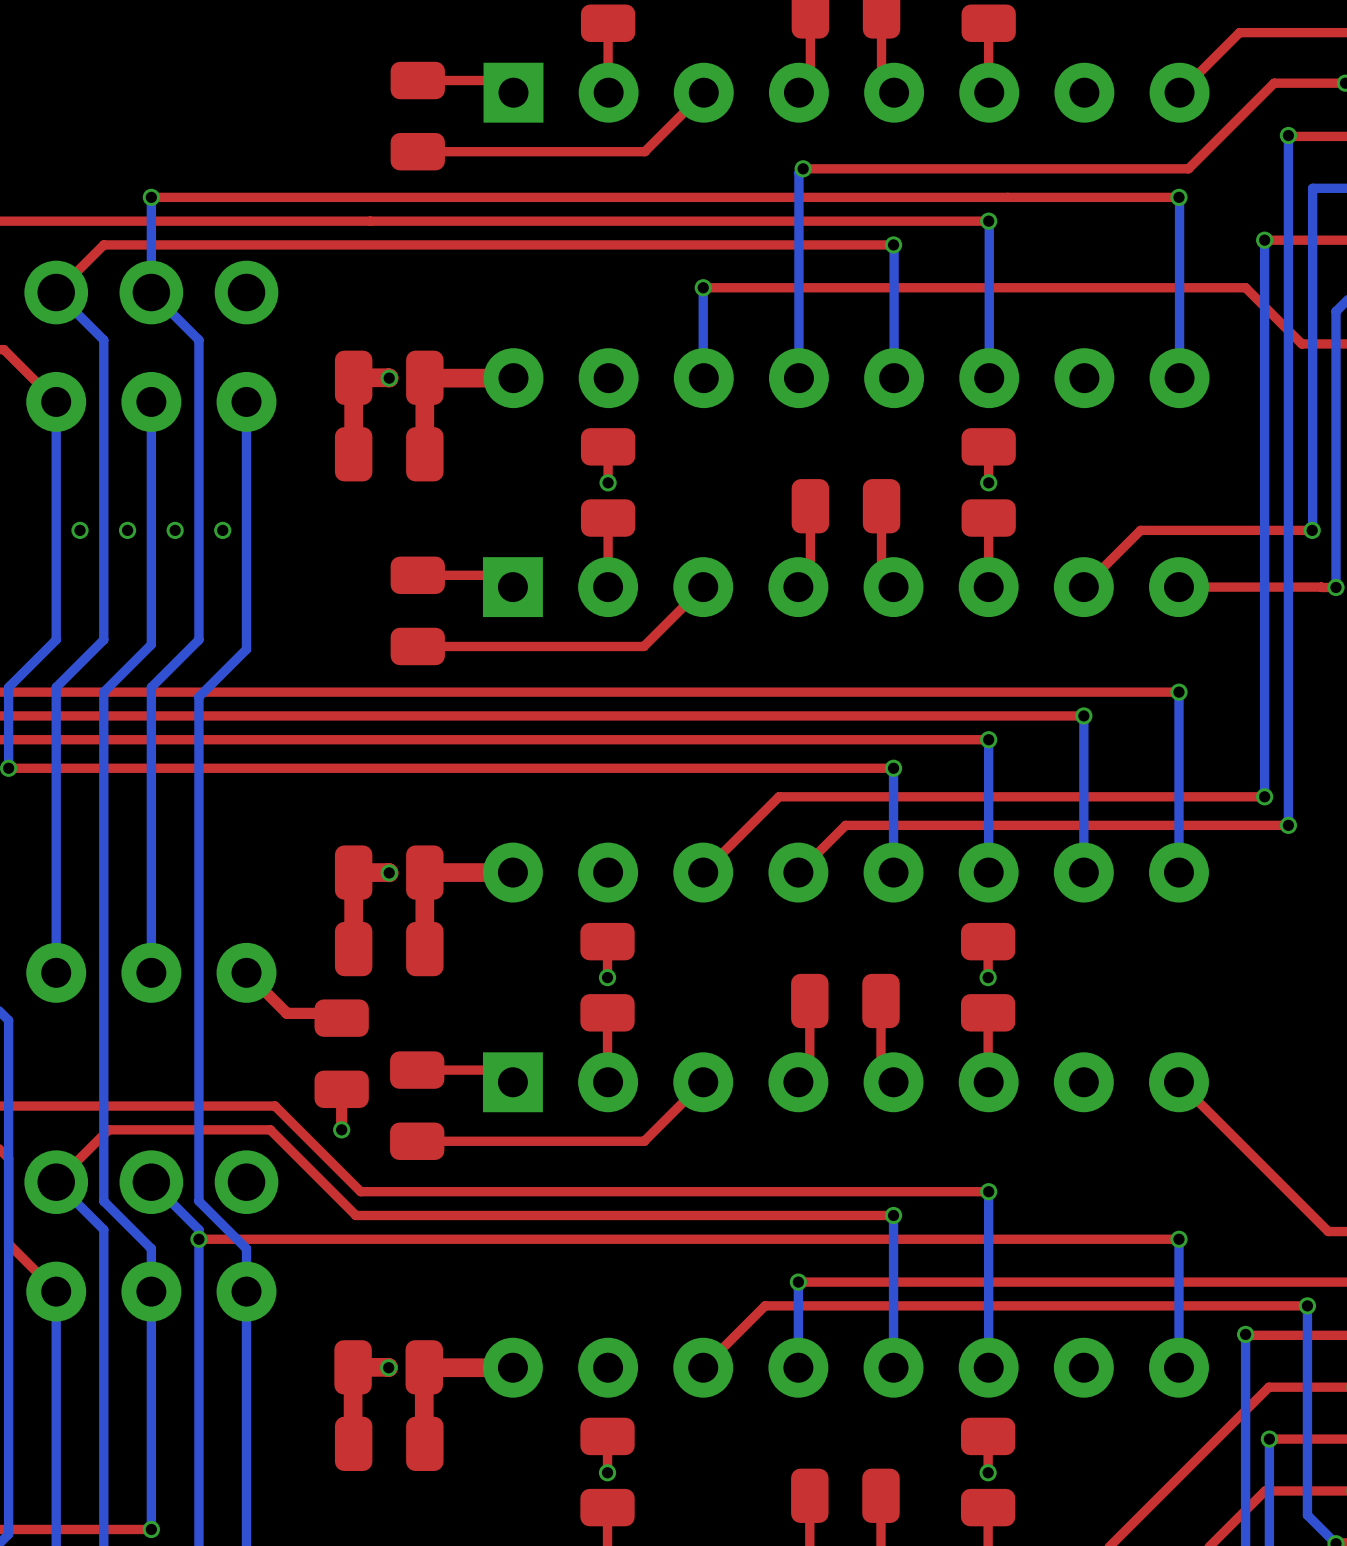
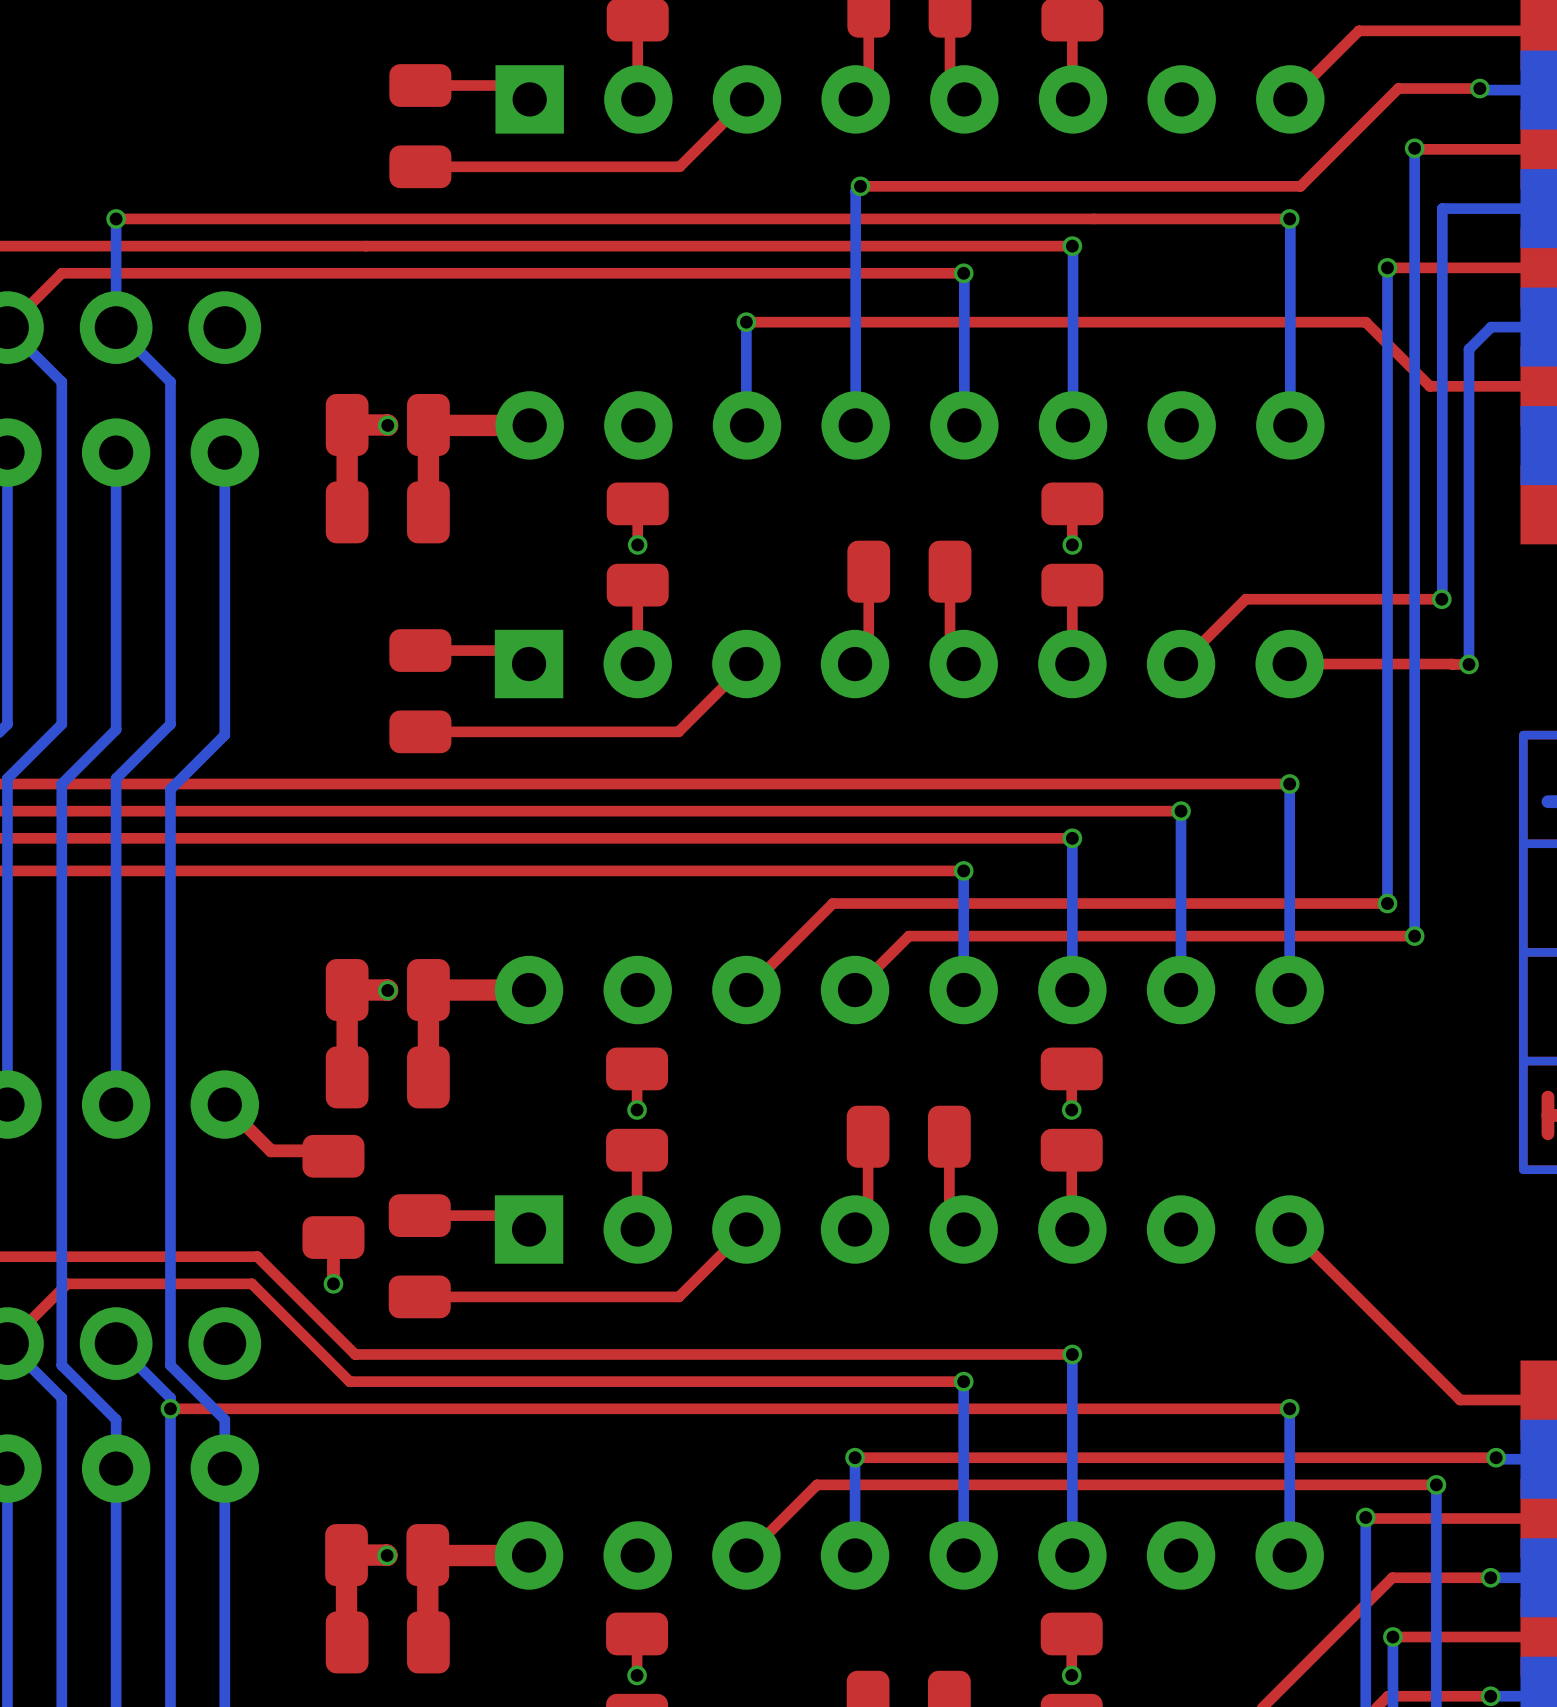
via: (80, 530) -> none
via: (127, 530) -> none
via: (175, 530) -> none
via: (222, 530) -> none

